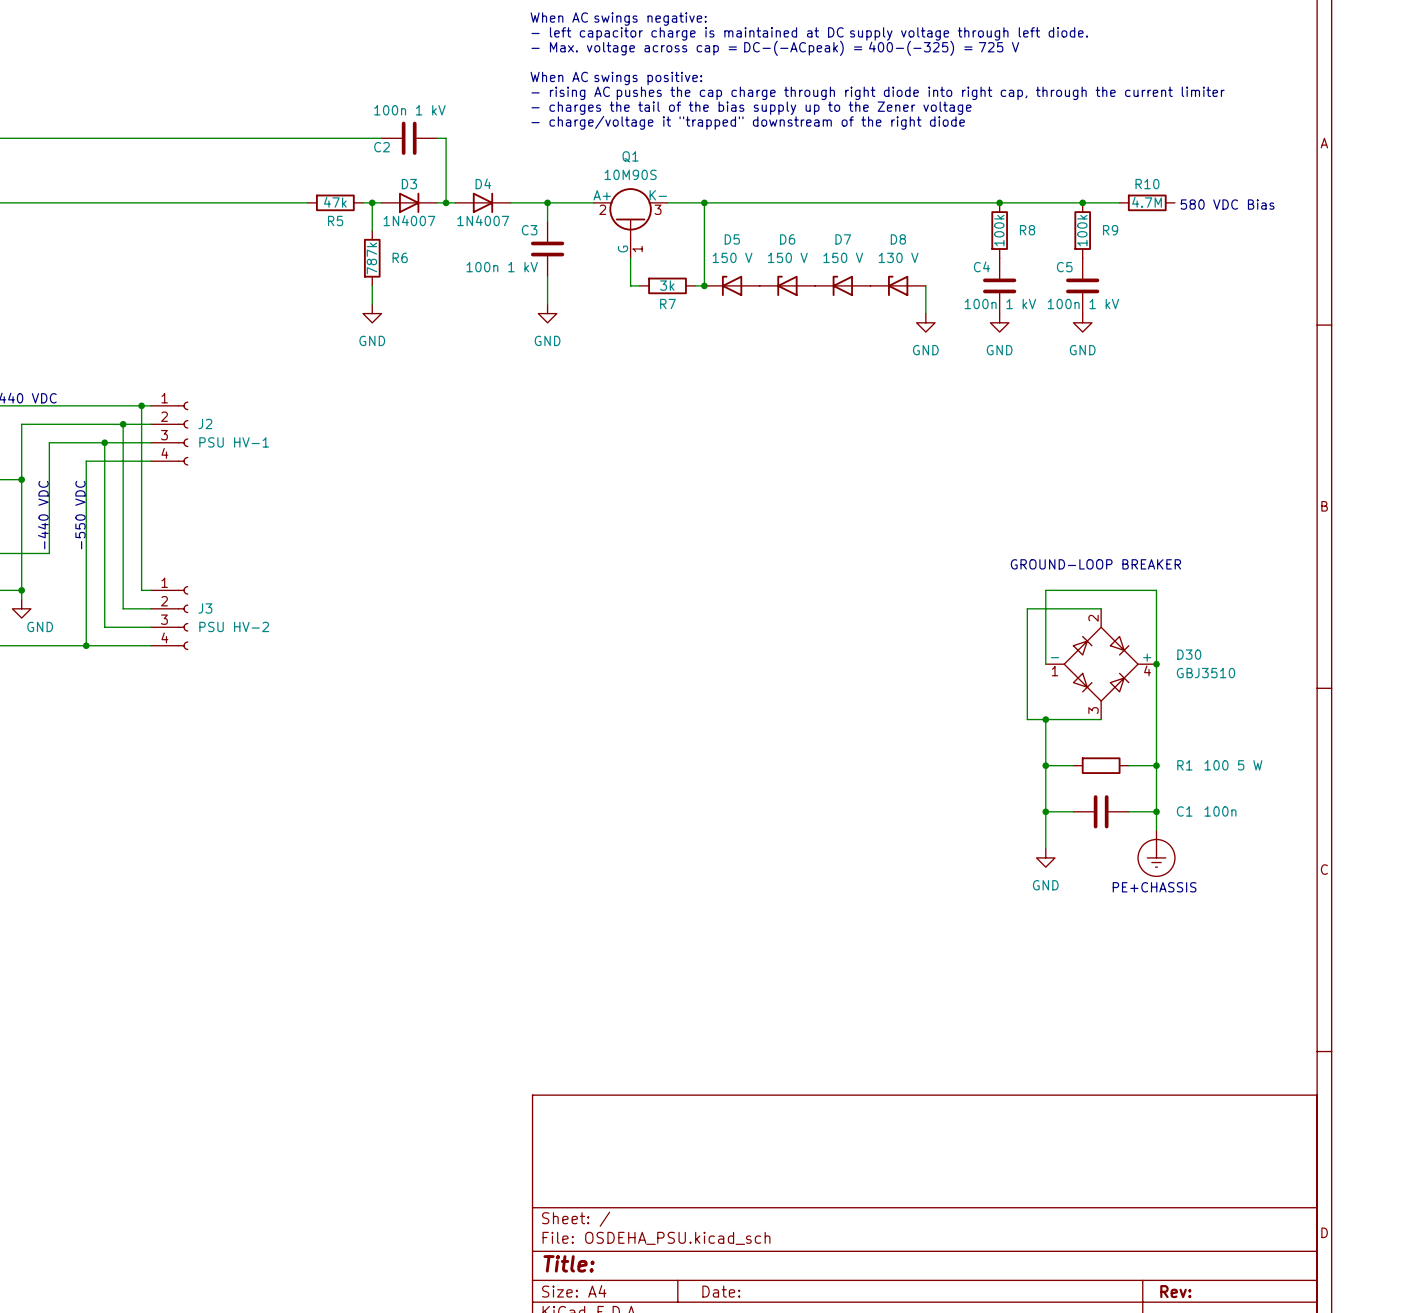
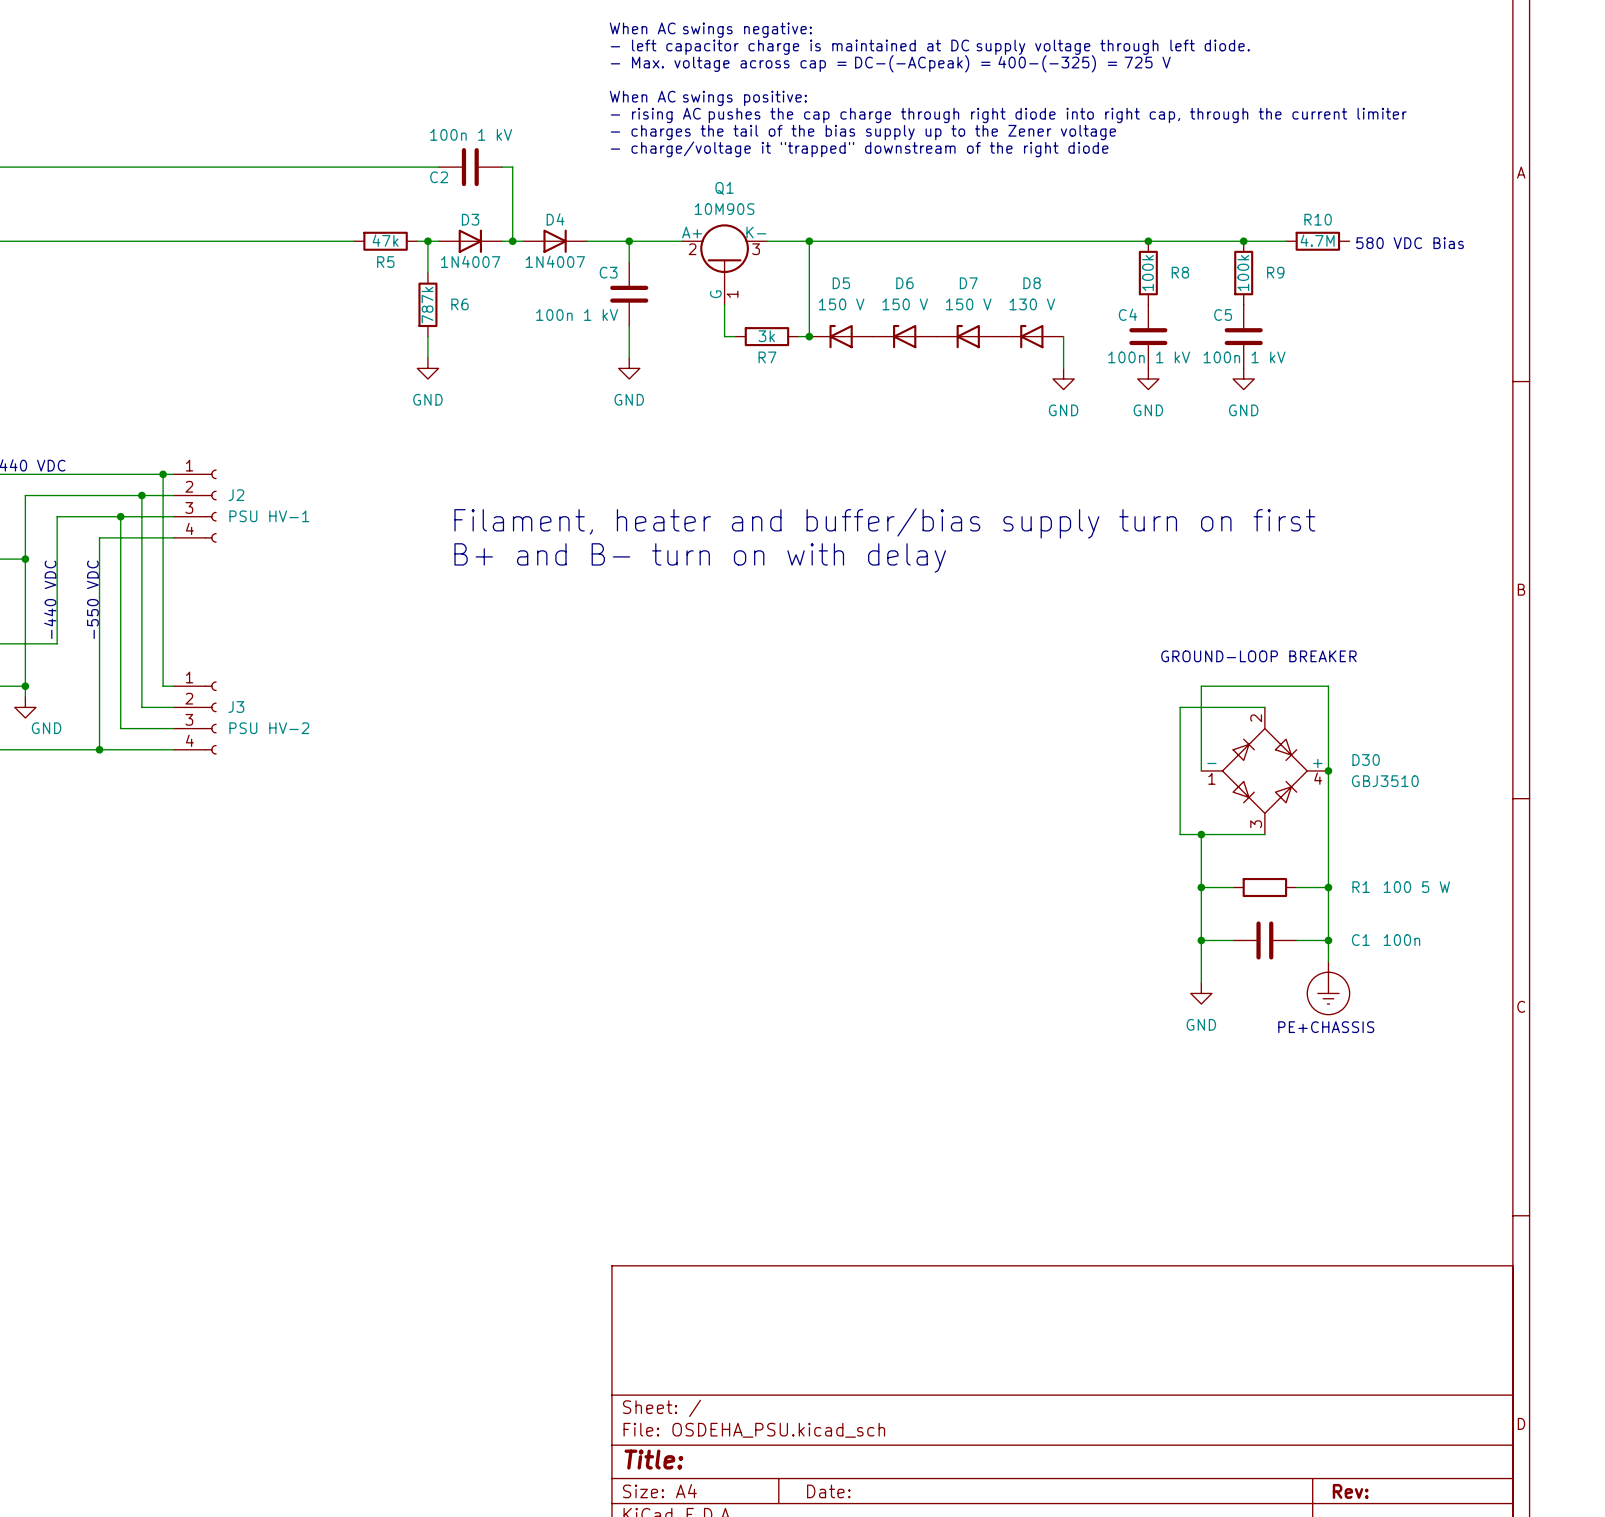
text: none -> Filament, heater and buffer/bias supply turn on first (884, 523)
text: none -> B+ and B- turn on with delay (700, 557)

